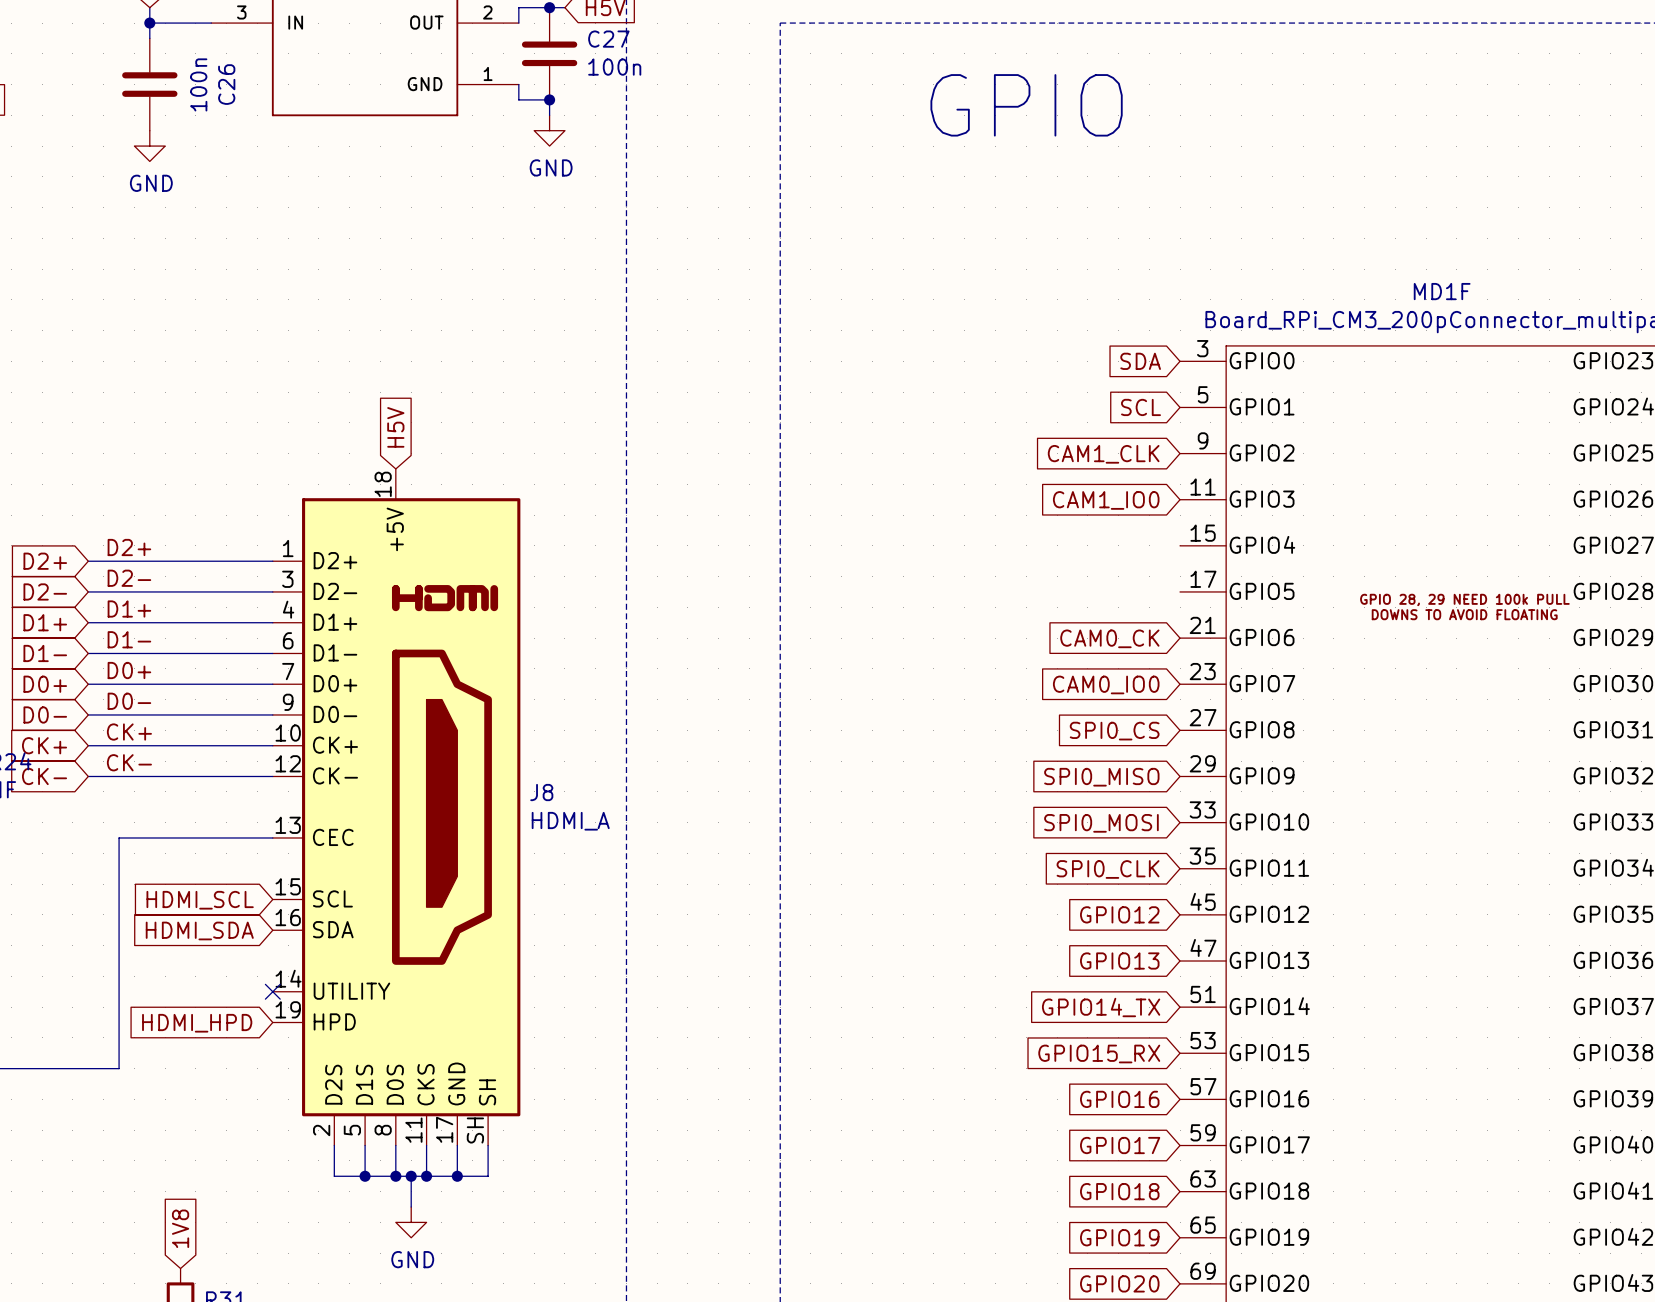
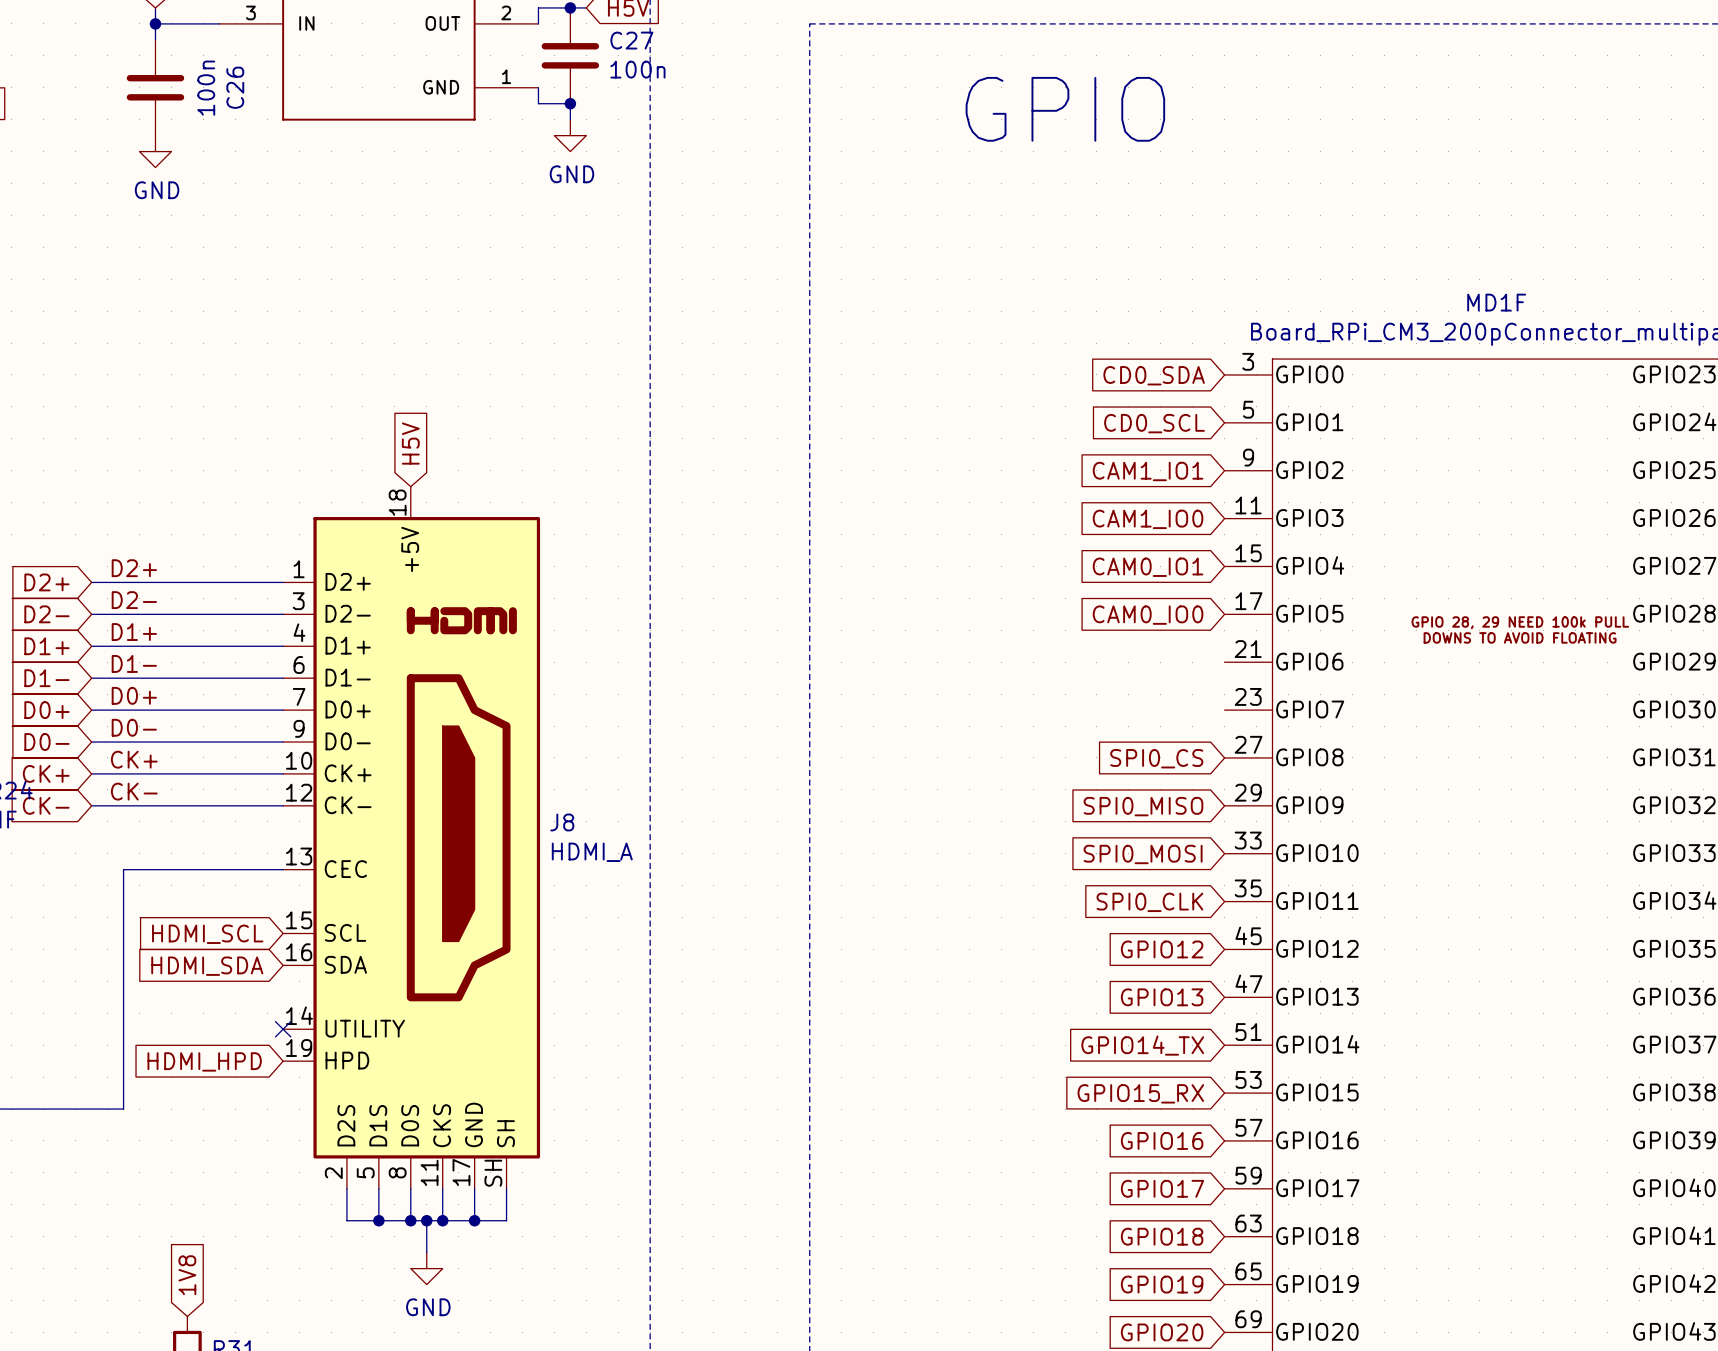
global label: SDA (1140, 361) -> CD0_SDA (1154, 375)
global label: SCL (1141, 407) -> CD0_SCL (1154, 423)
global label: CAM1_CLK (1103, 454) -> CAM1_IO1 (1148, 471)
global label: none -> CAM0_IO1 (1148, 567)
global label: CAM0_CK (1109, 638) -> none
global label position: CAM0_IO0 (1106, 684) -> CAM0_IO0 (1148, 615)

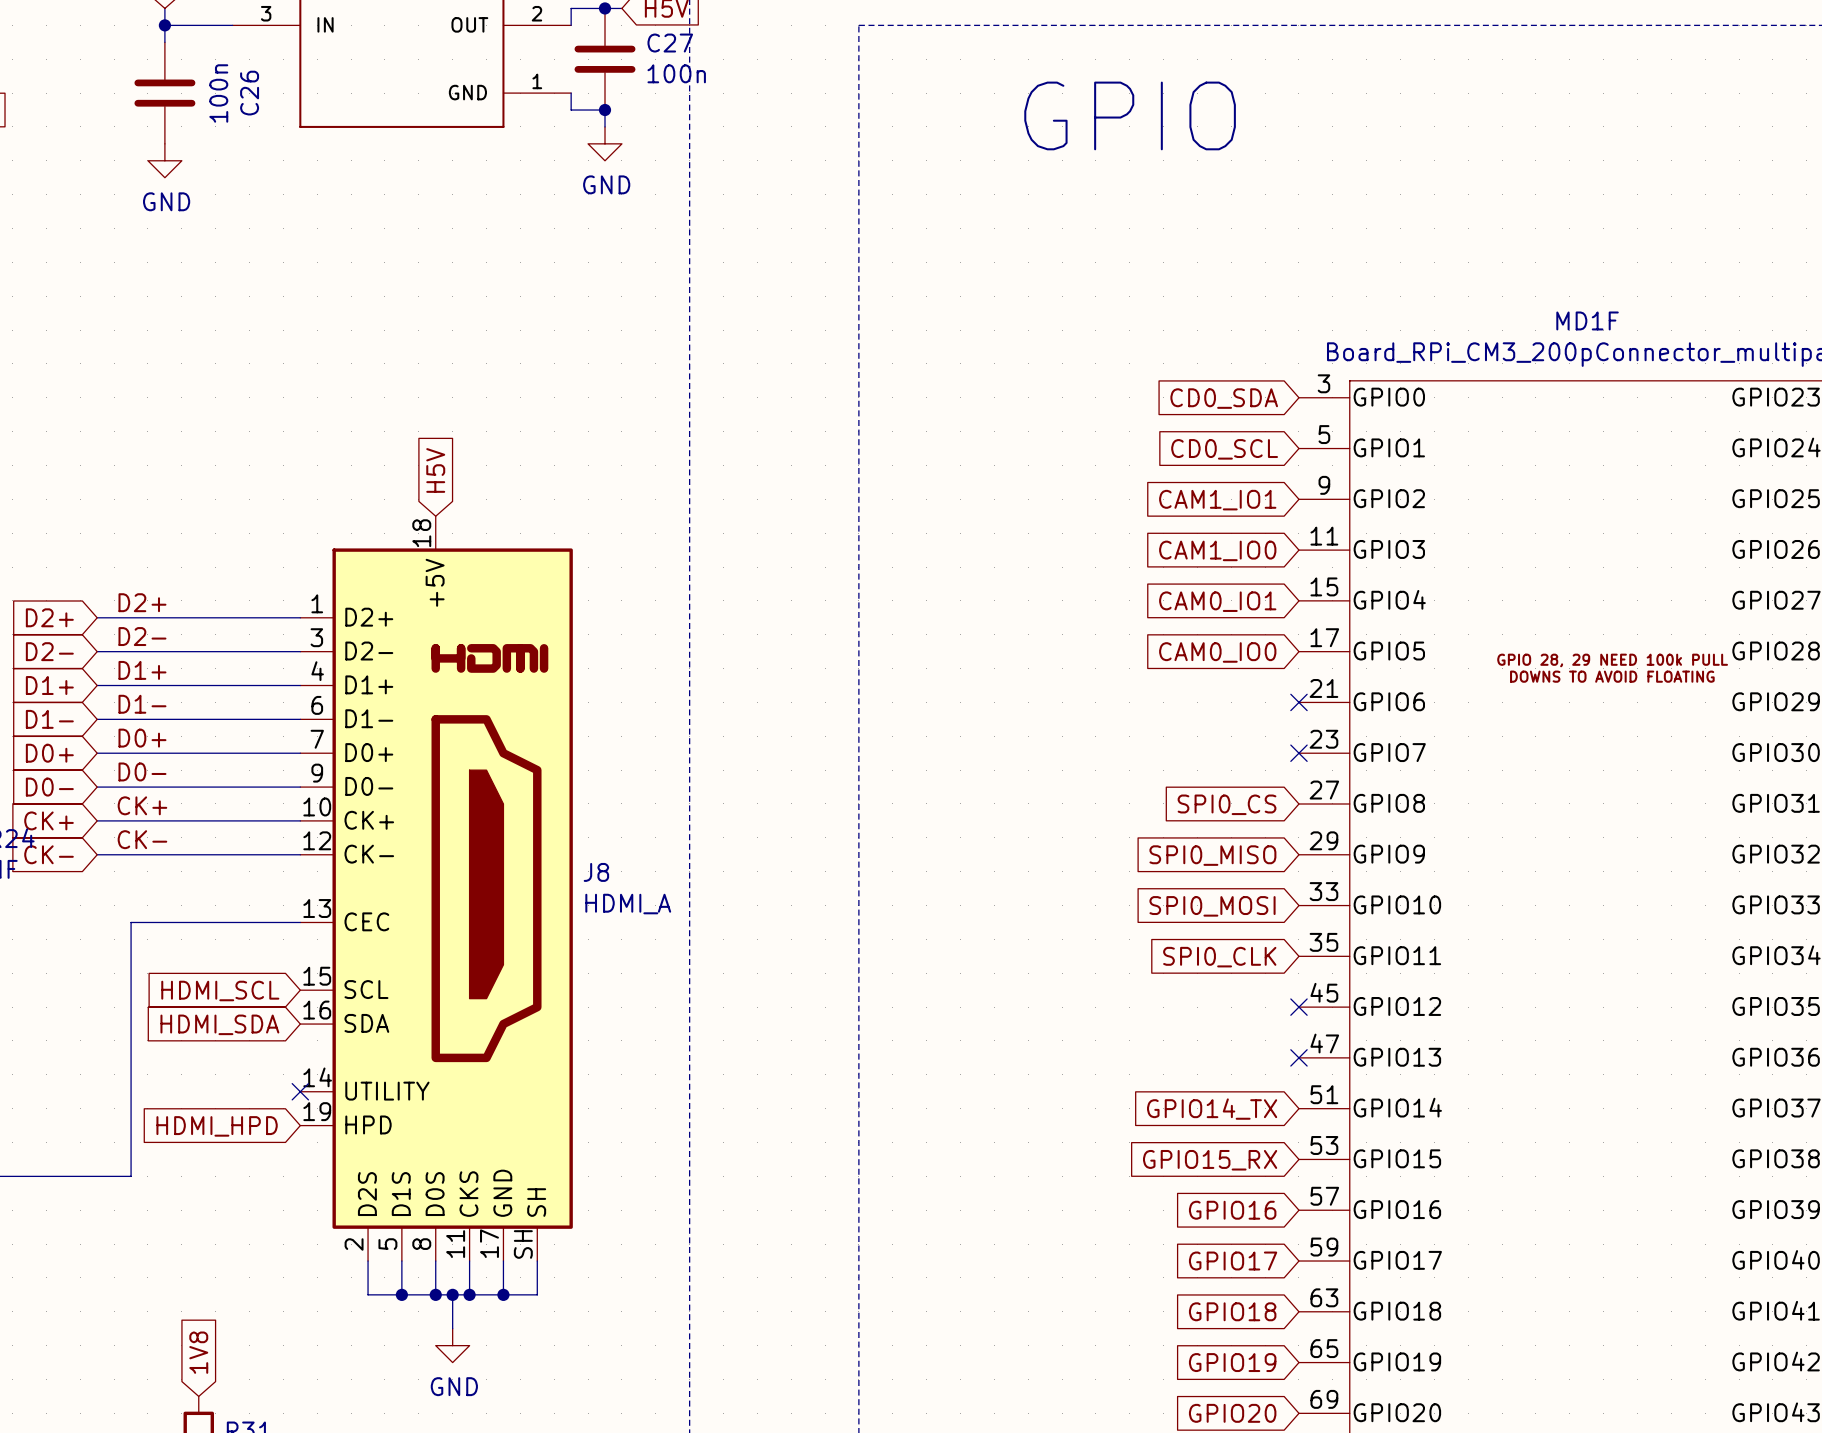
no-connect mark: none -> (1298, 702)
no-connect mark: none -> (1298, 753)
global label: GPIO12 (1162, 949) -> none
no-connect mark: none -> (1298, 1007)
global label: GPIO13 (1162, 997) -> none
no-connect mark: none -> (1298, 1057)

